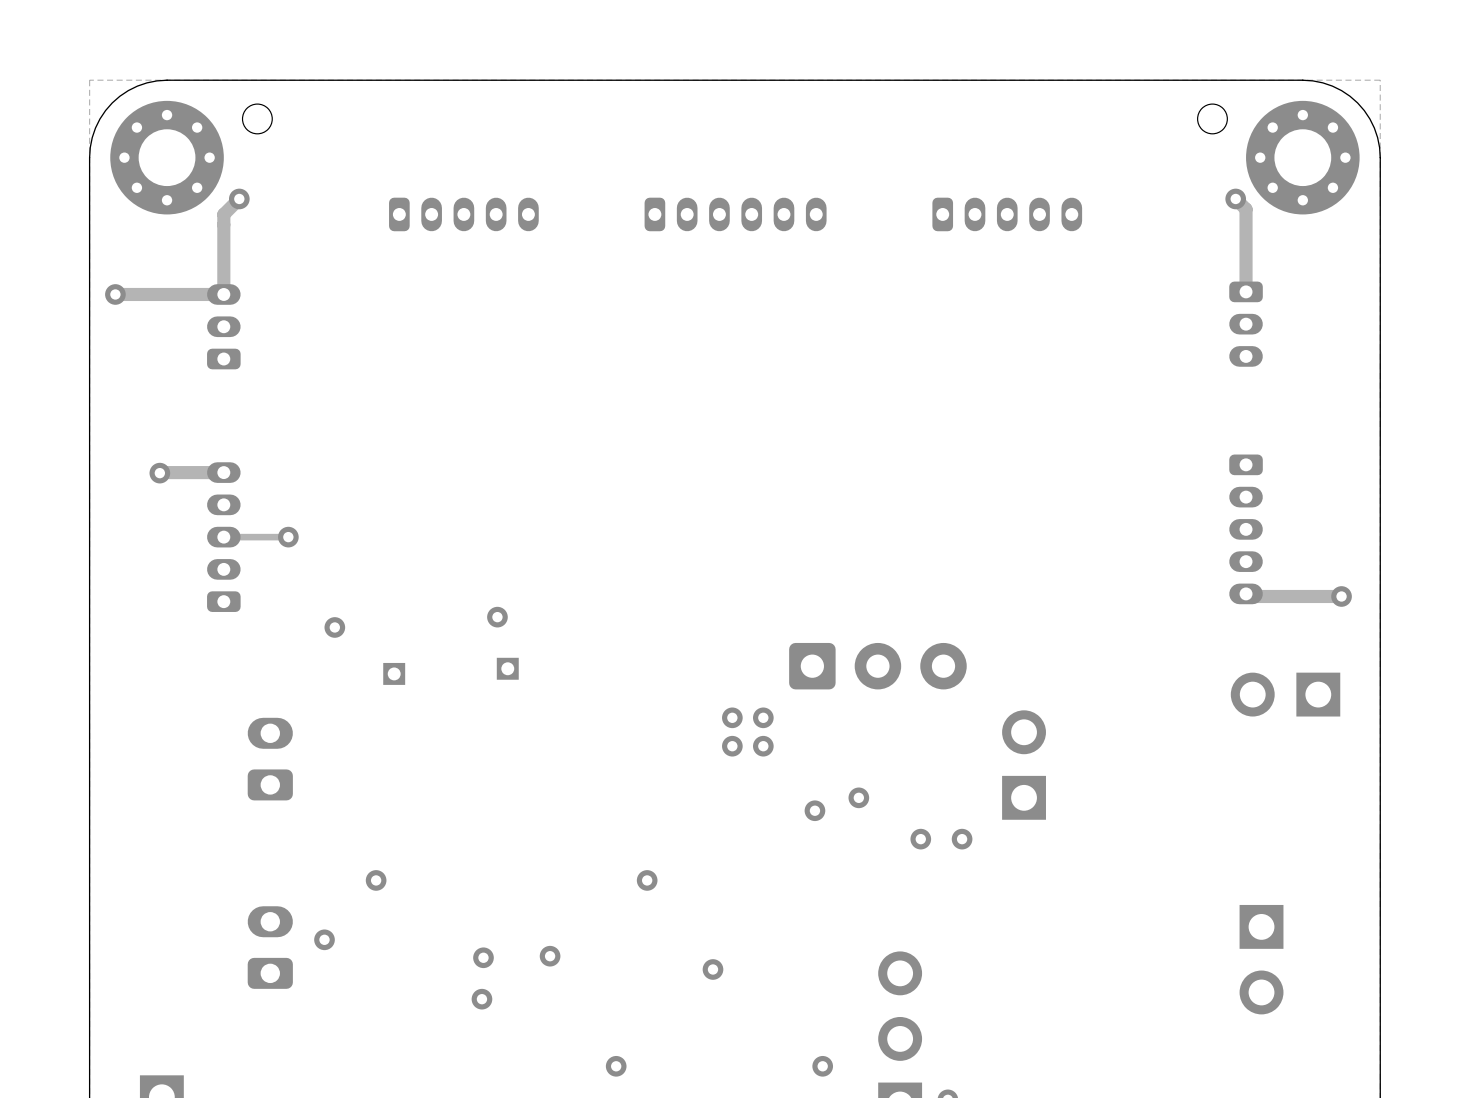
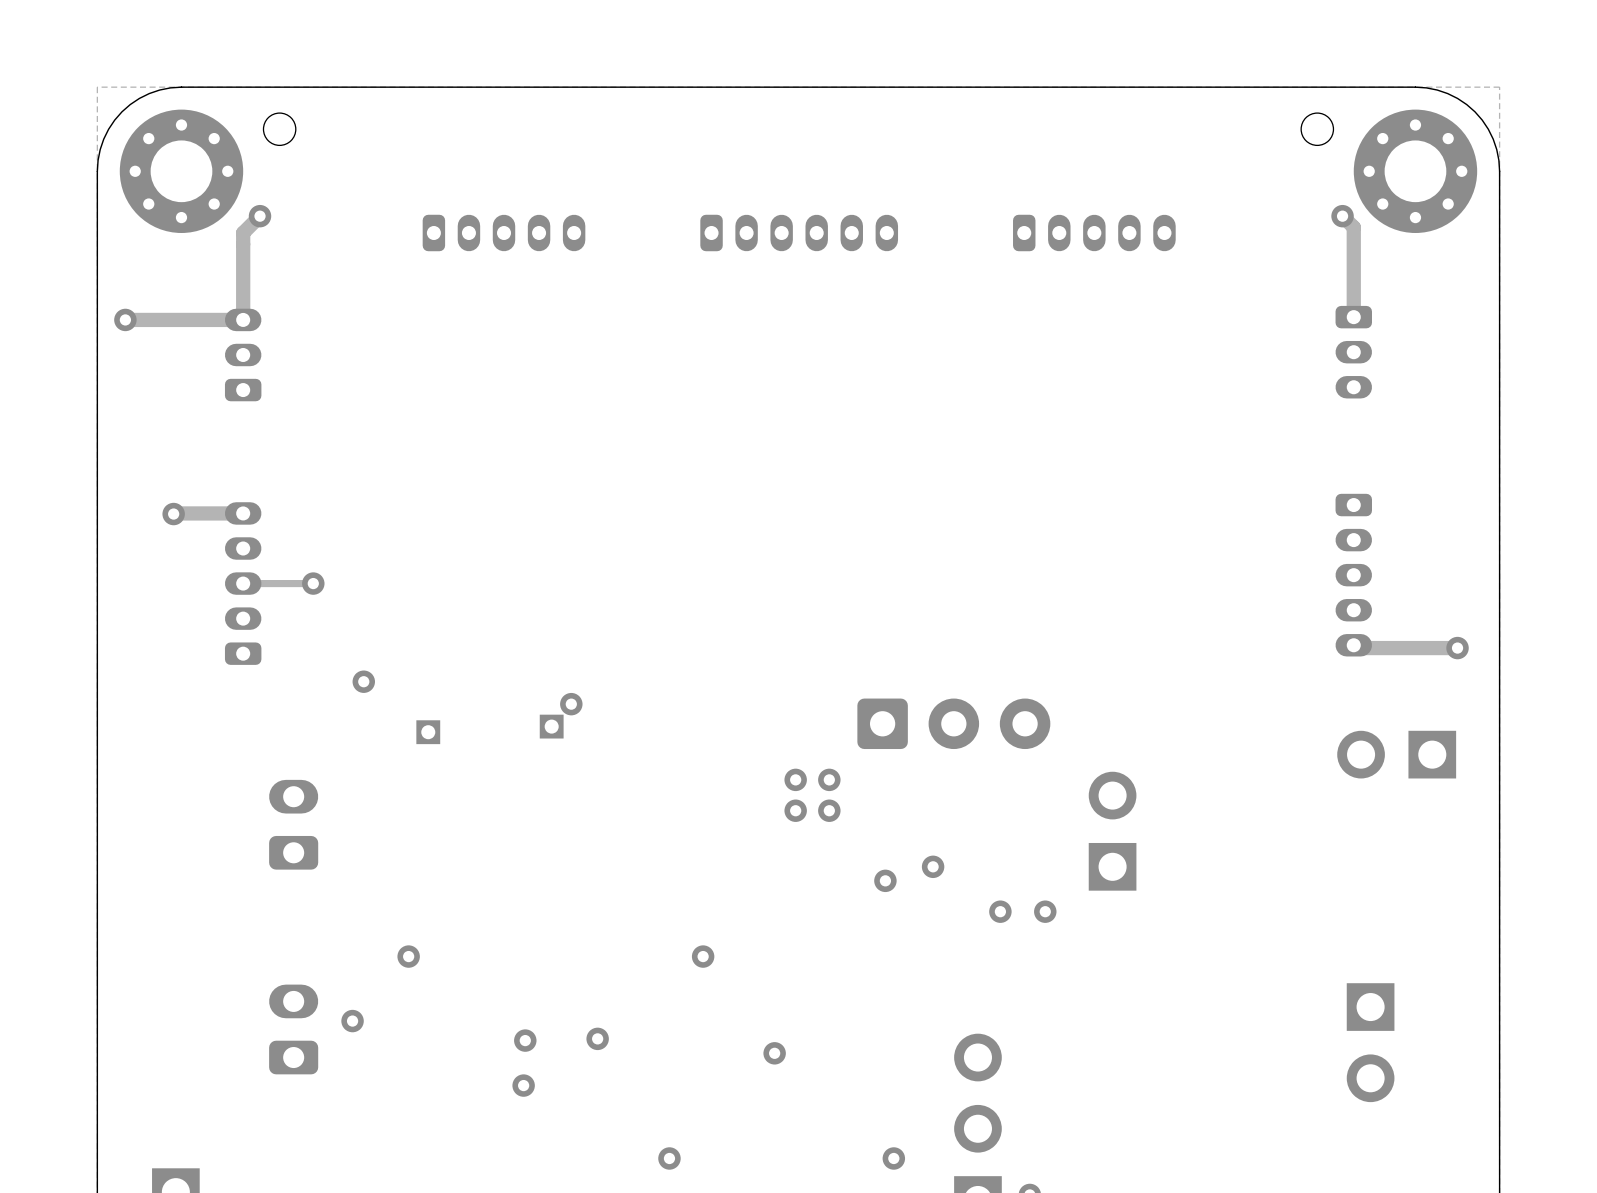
via position: (497, 617) -> (571, 704)

